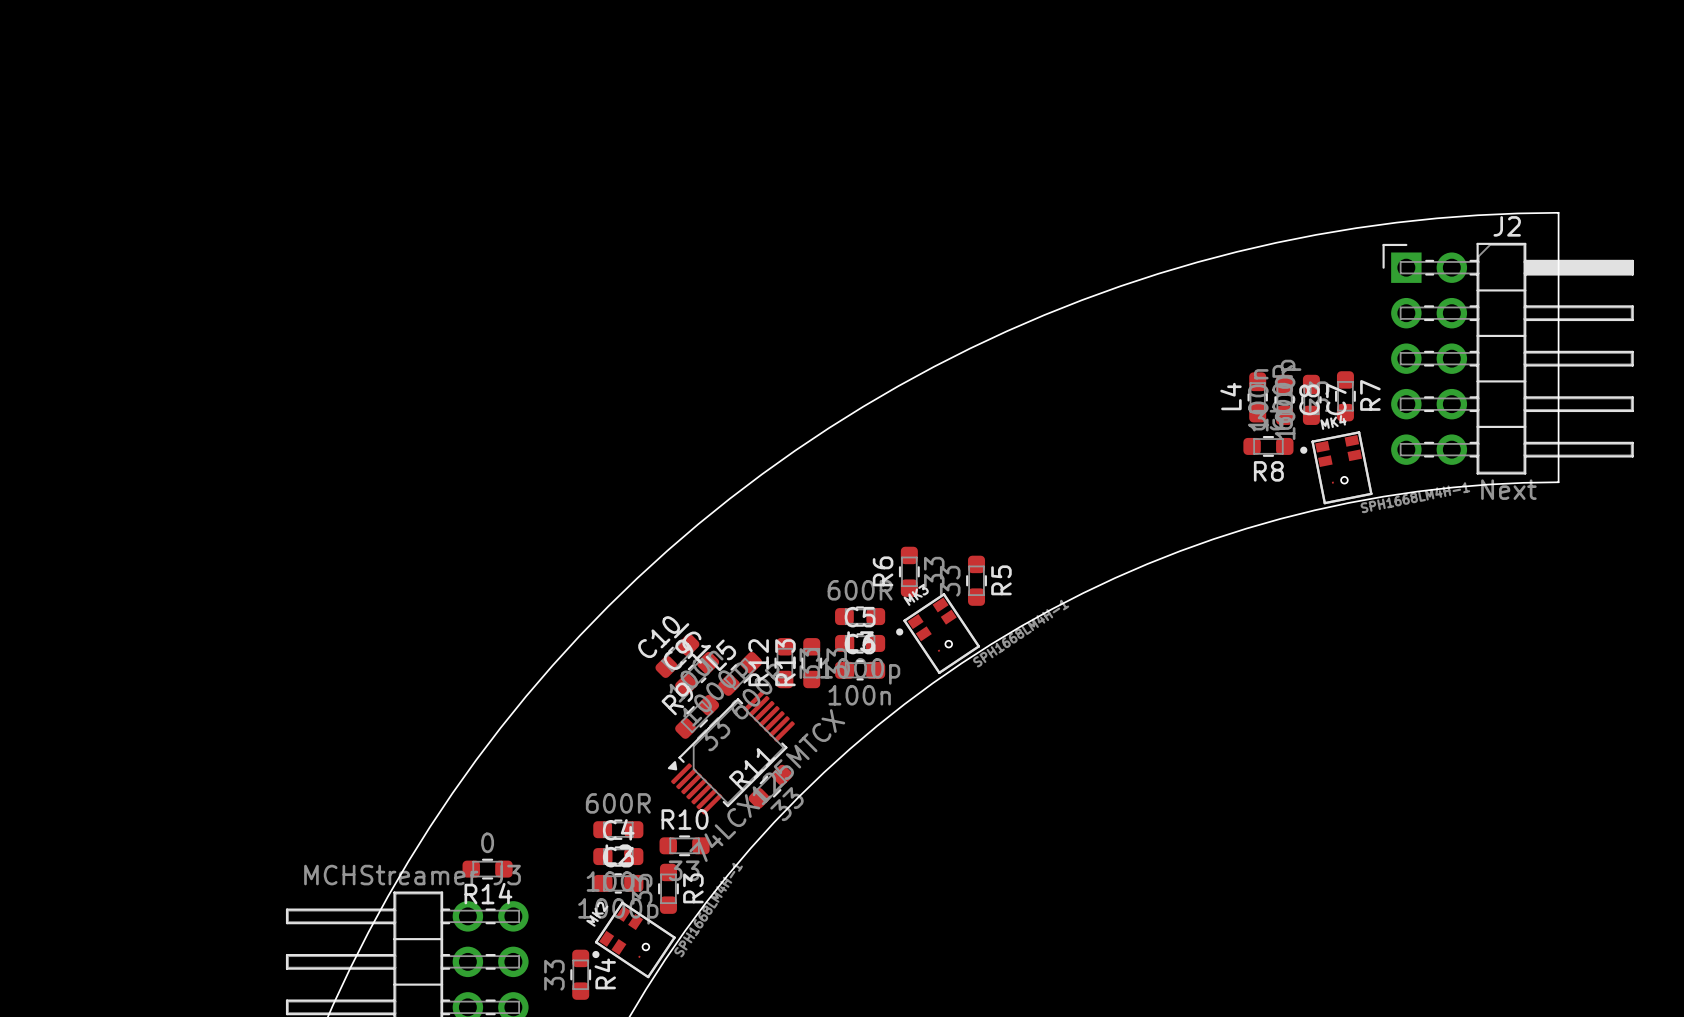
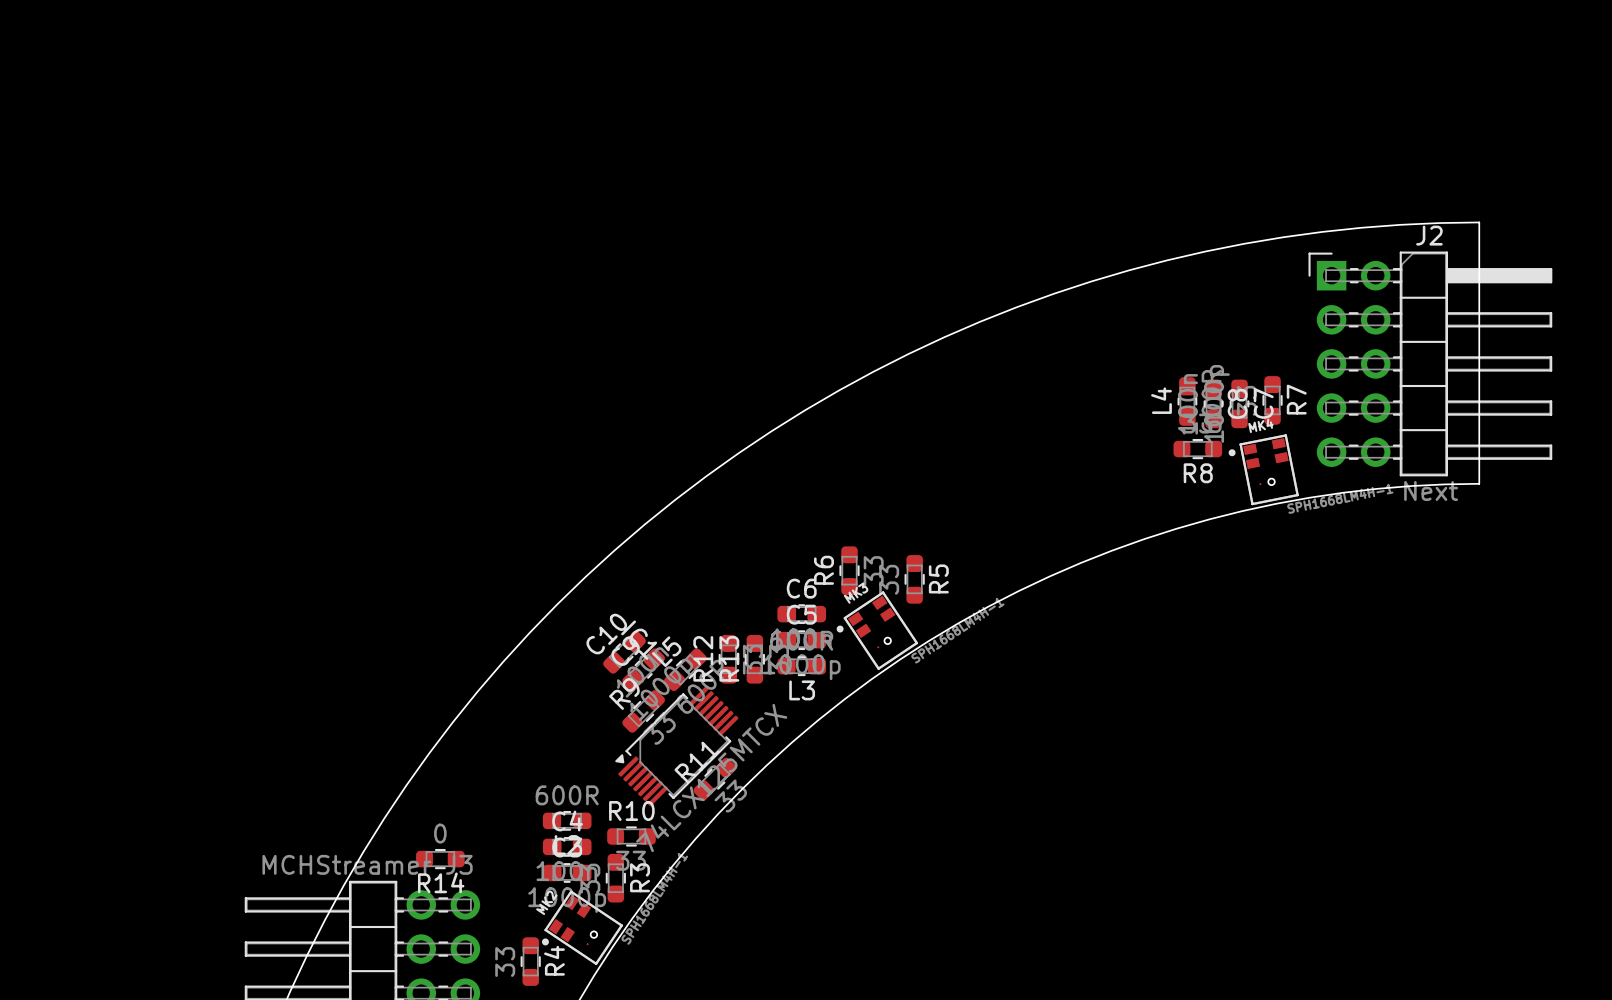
L3 position: (860, 616) -> (801, 666)
C6 position: (860, 670) -> (801, 614)

